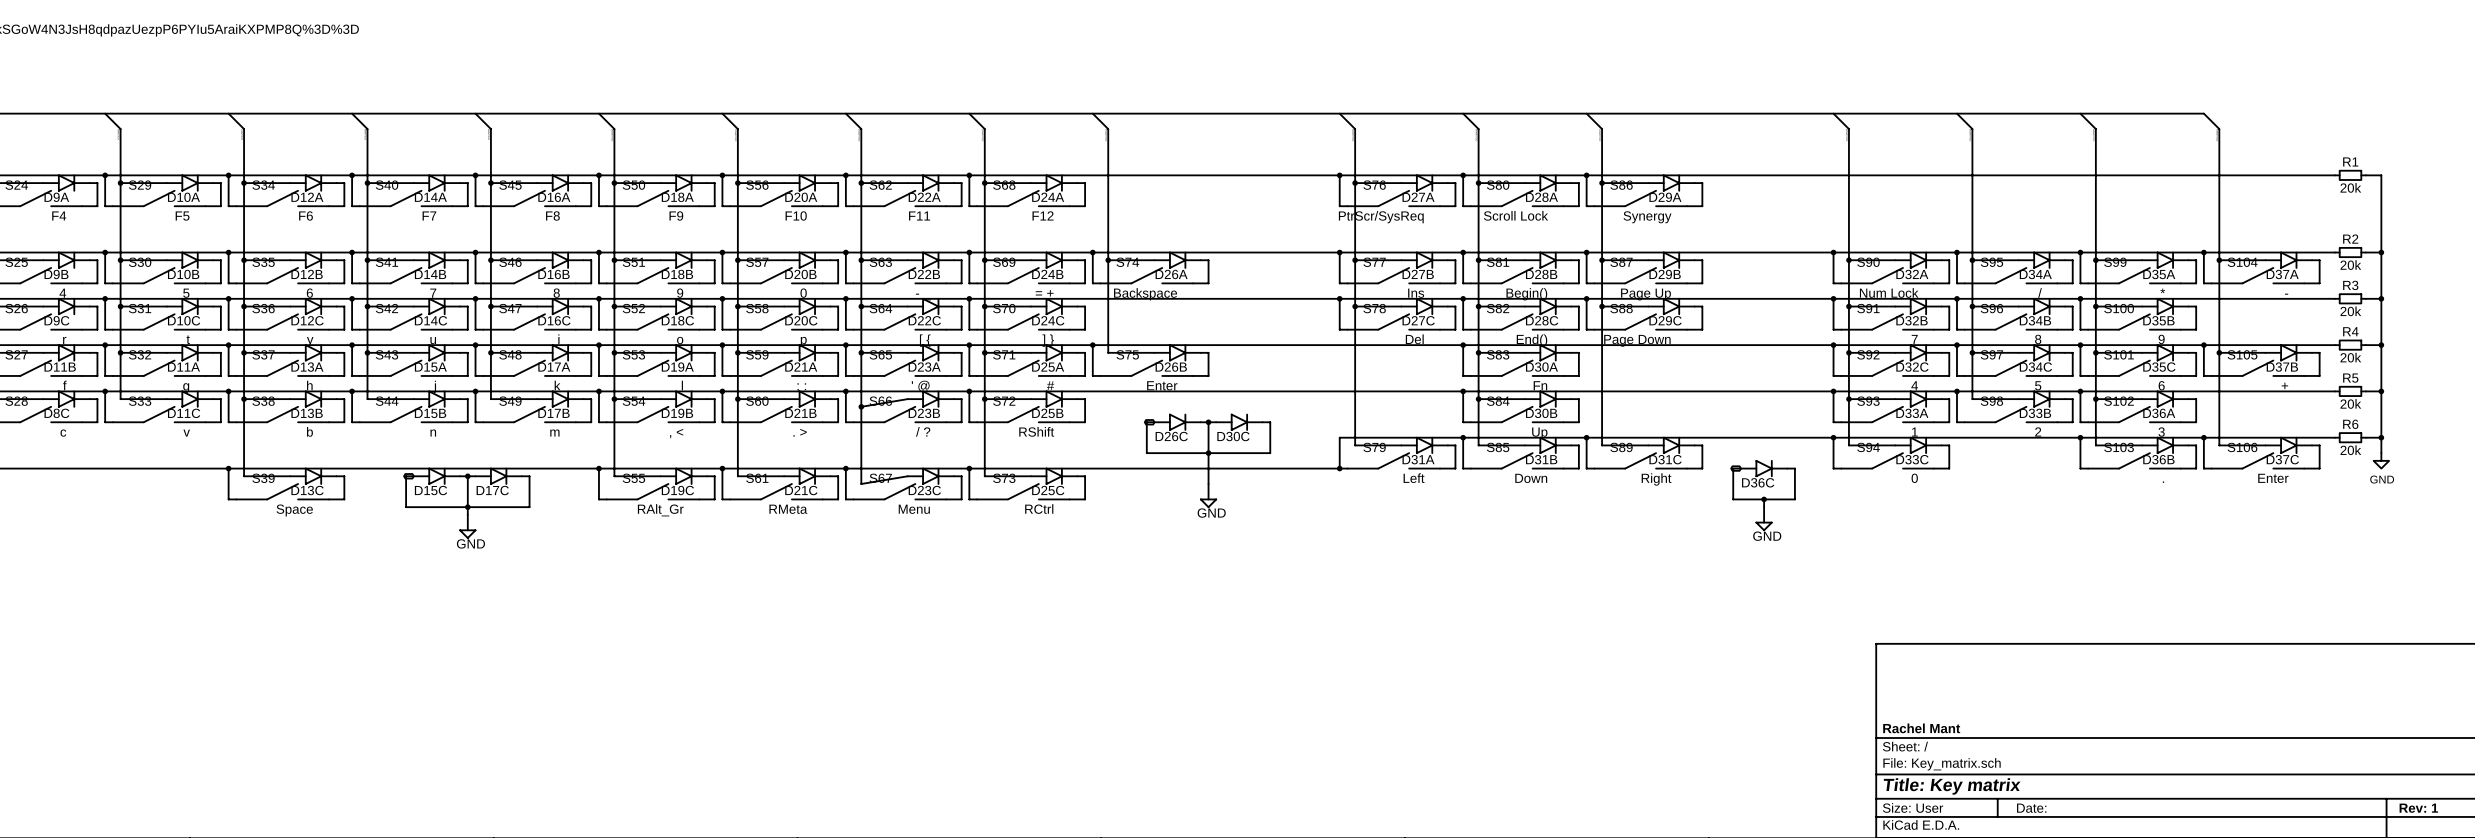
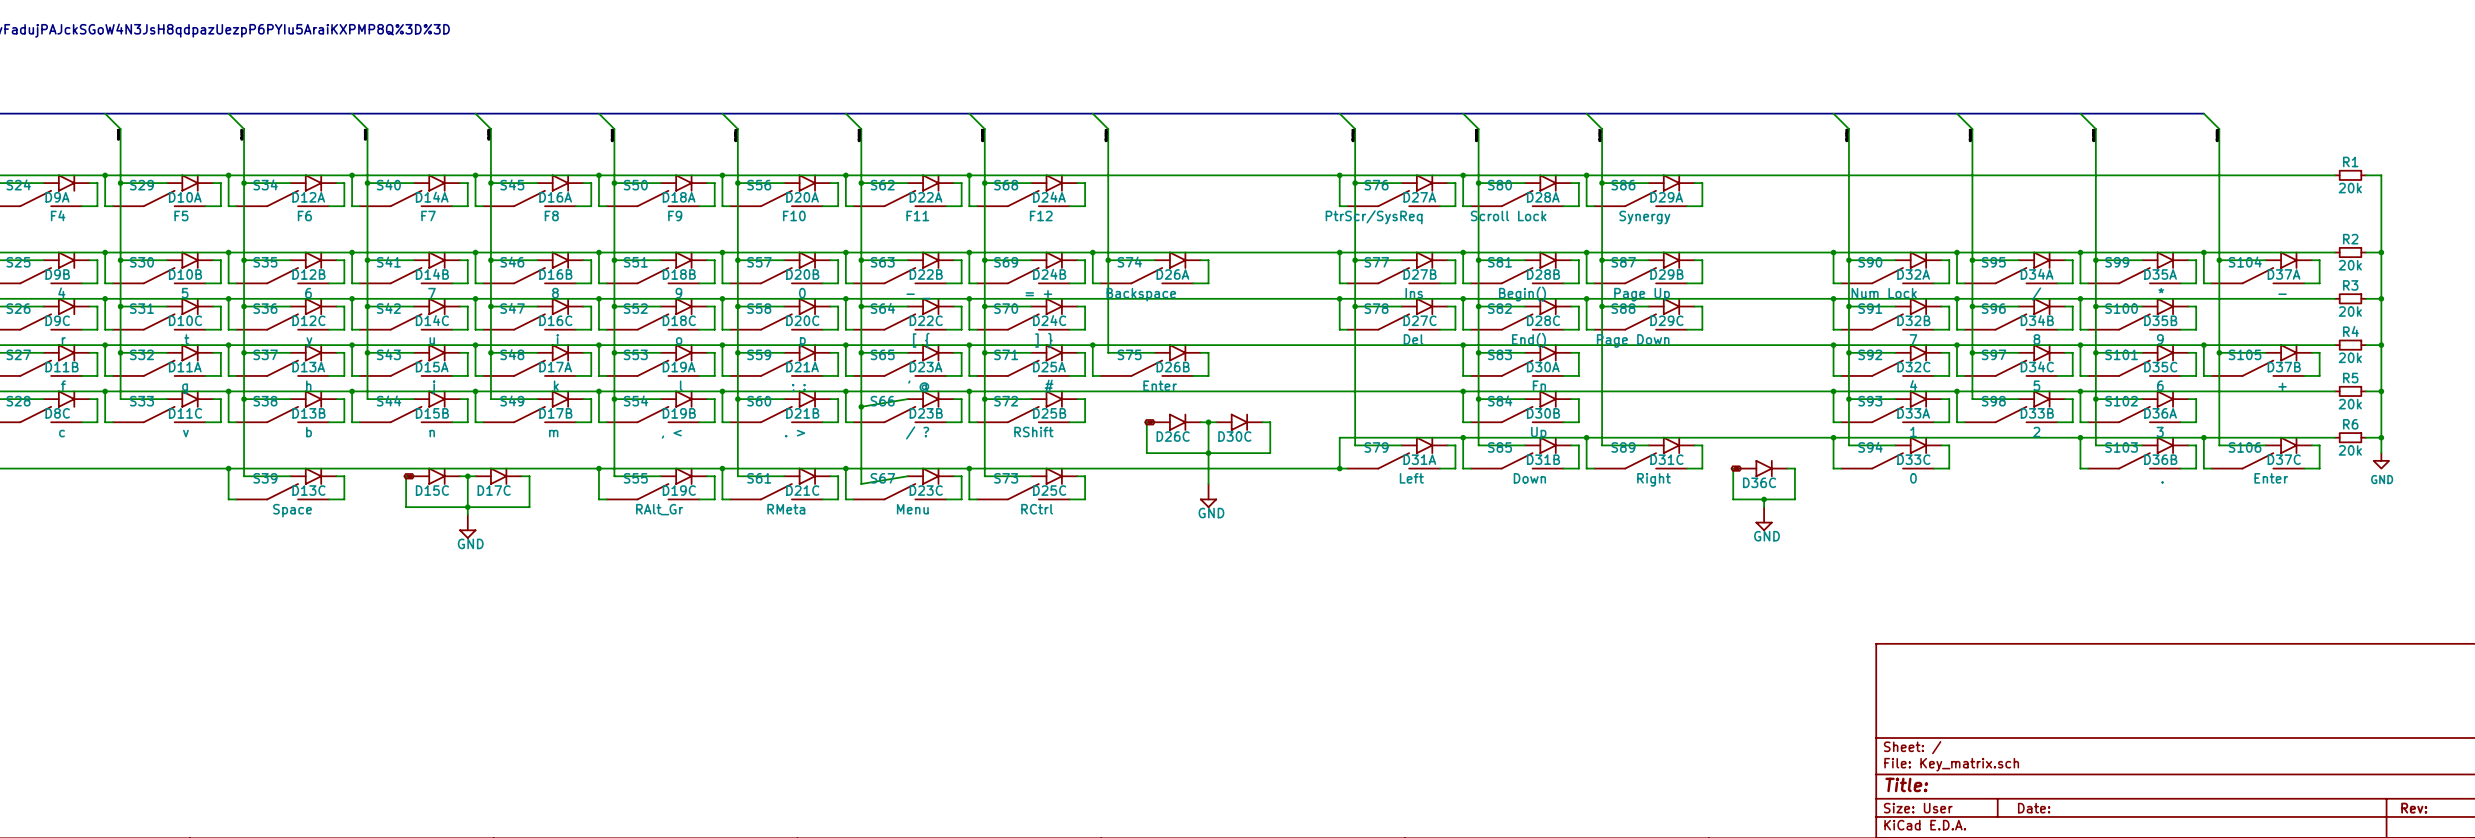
title block: Rachel Mant (1921, 728) -> none
title block: Title: Key matrix (1952, 786) -> Title: (1906, 784)
title block: Rev: 1 (2418, 808) -> Rev: (2414, 808)

